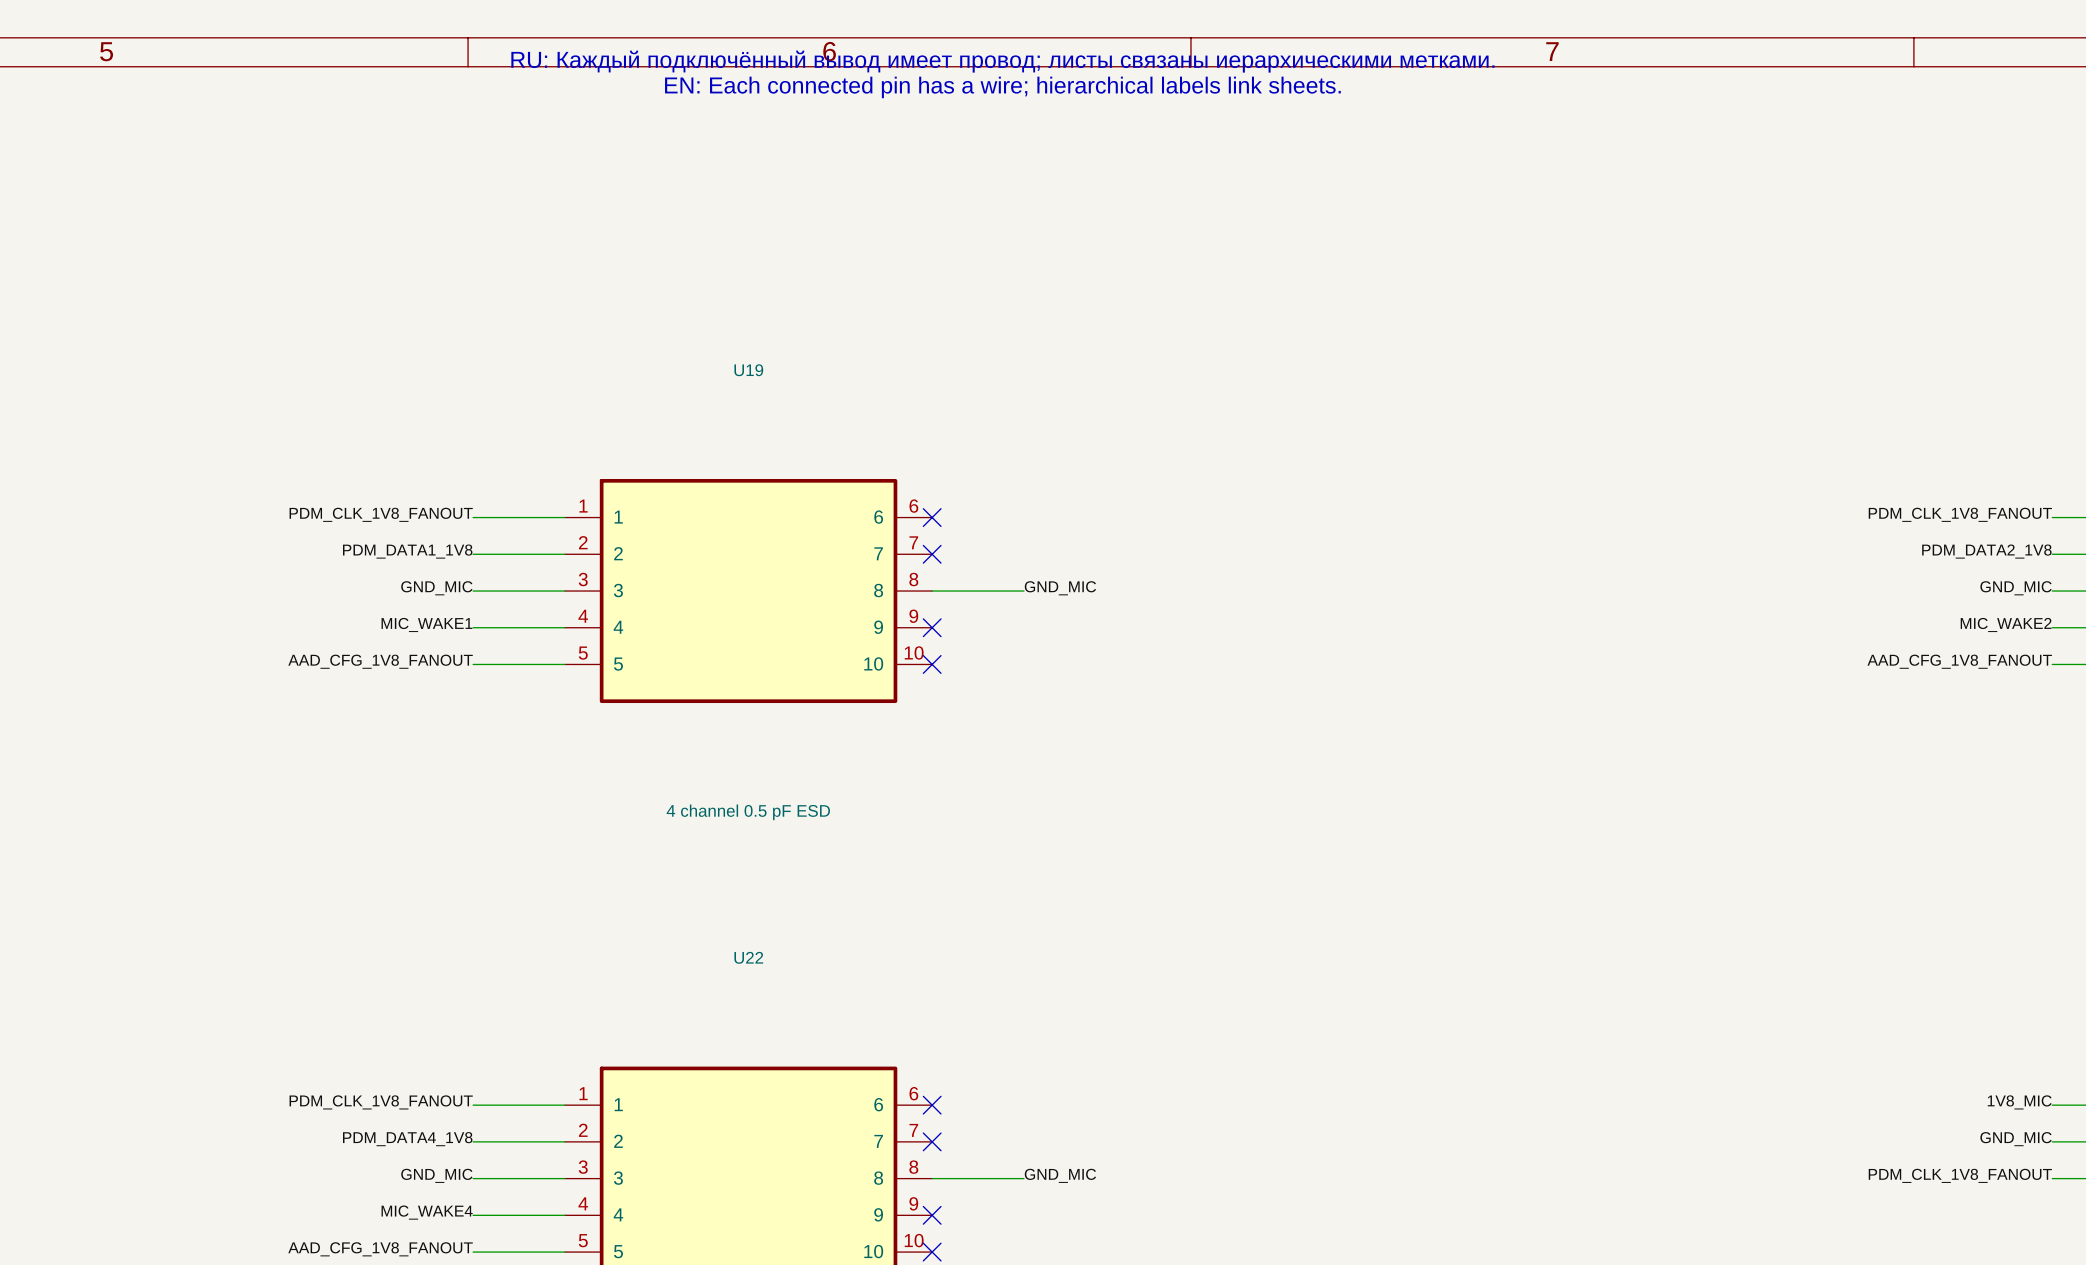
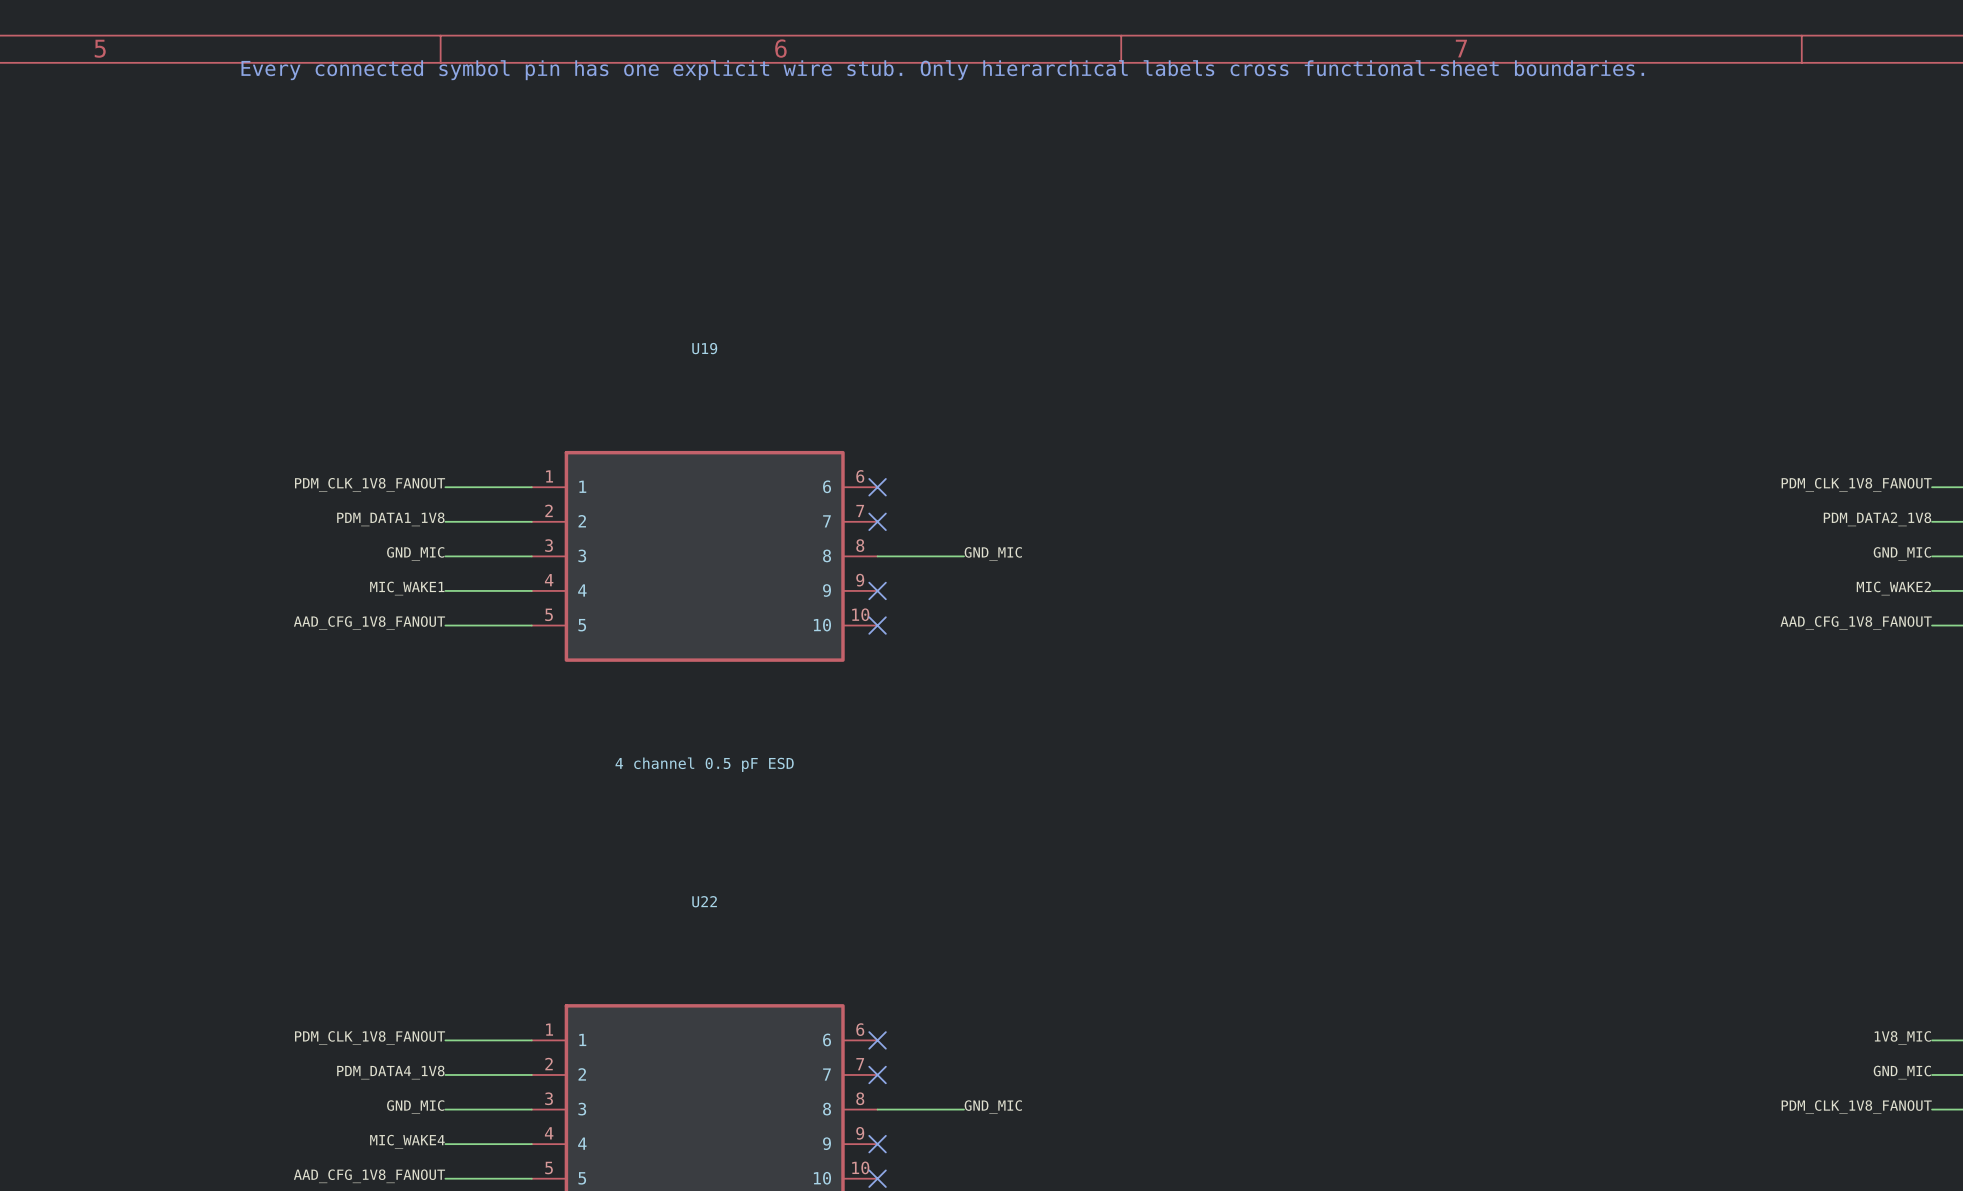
text: RU: Каждый подключённый вывод имеет провод; листы связаны иерархическими метками. (1002, 61) -> none
text: none -> Every connected symbol pin has one explicit wire stub. Only hierarchical labels cross functional-sheet boundaries. (942, 70)
text: EN: Each connected pin has a wire; hierarchical labels link sheets. (1002, 87) -> none

